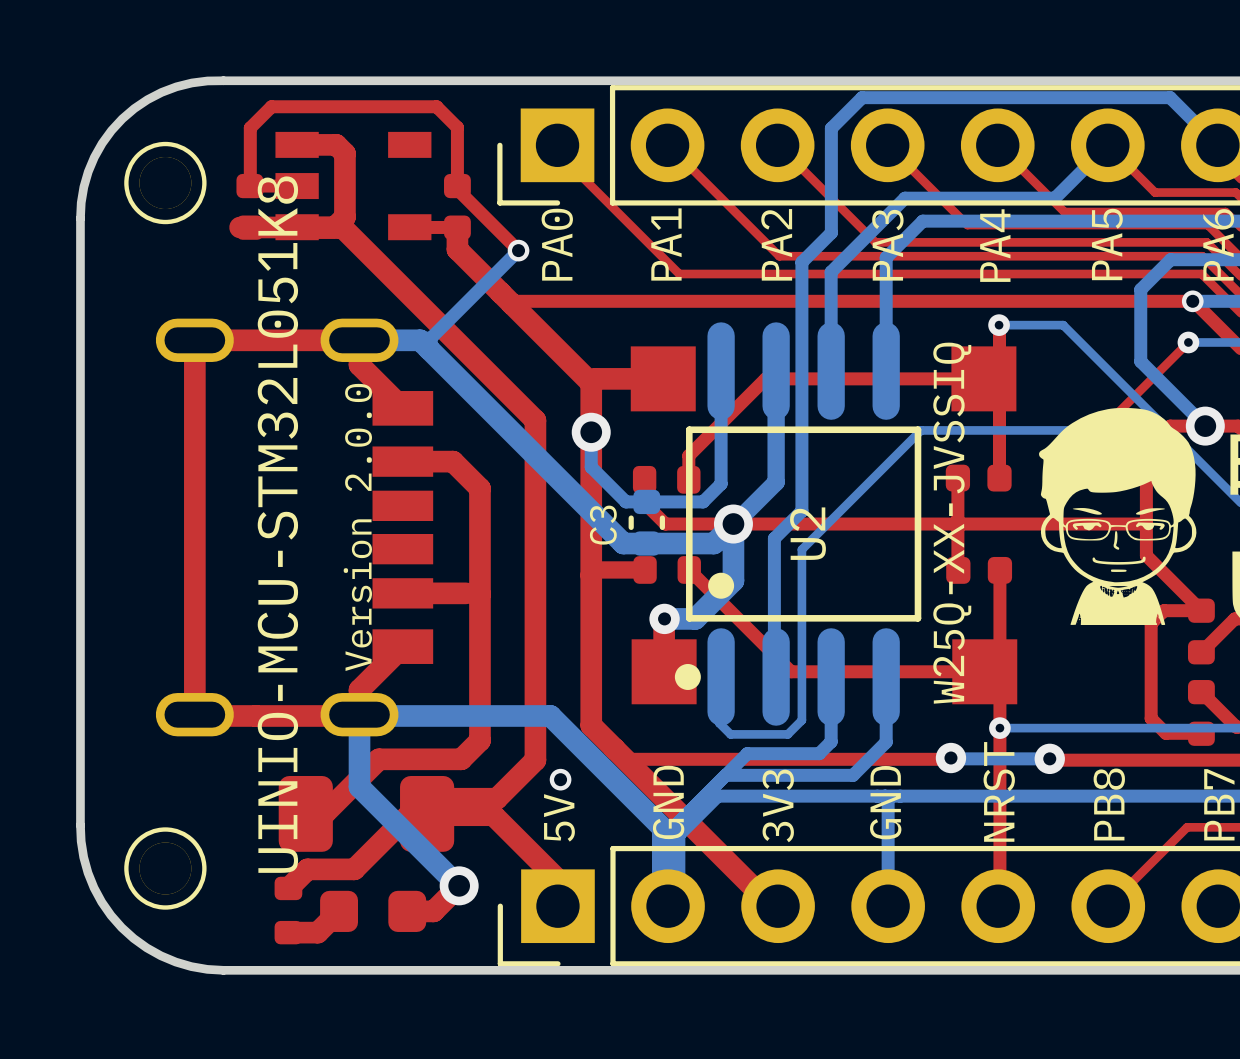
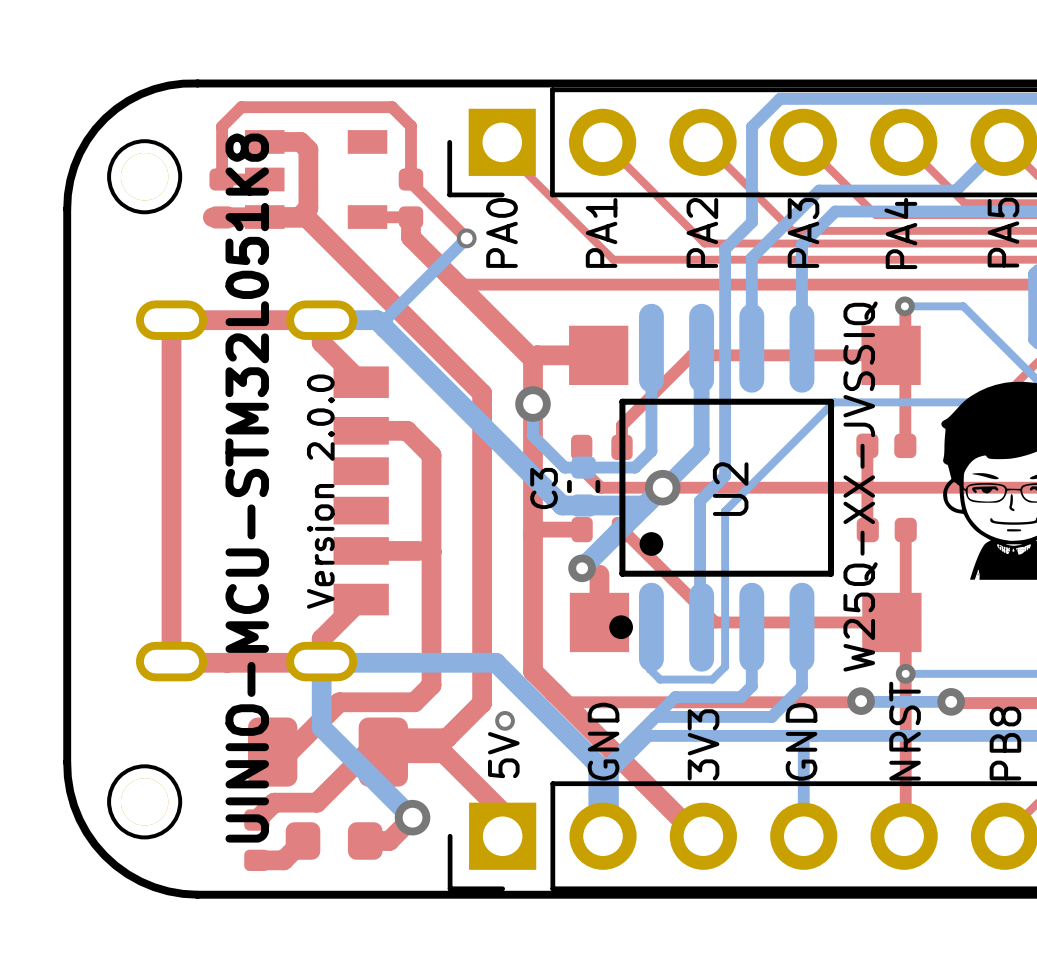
bottom track: (733, 524) (733, 580) (695, 618) (664, 618) -> none
bottom track: none -> (644, 505) (582, 568)
via position: (664, 618) -> (582, 568)

